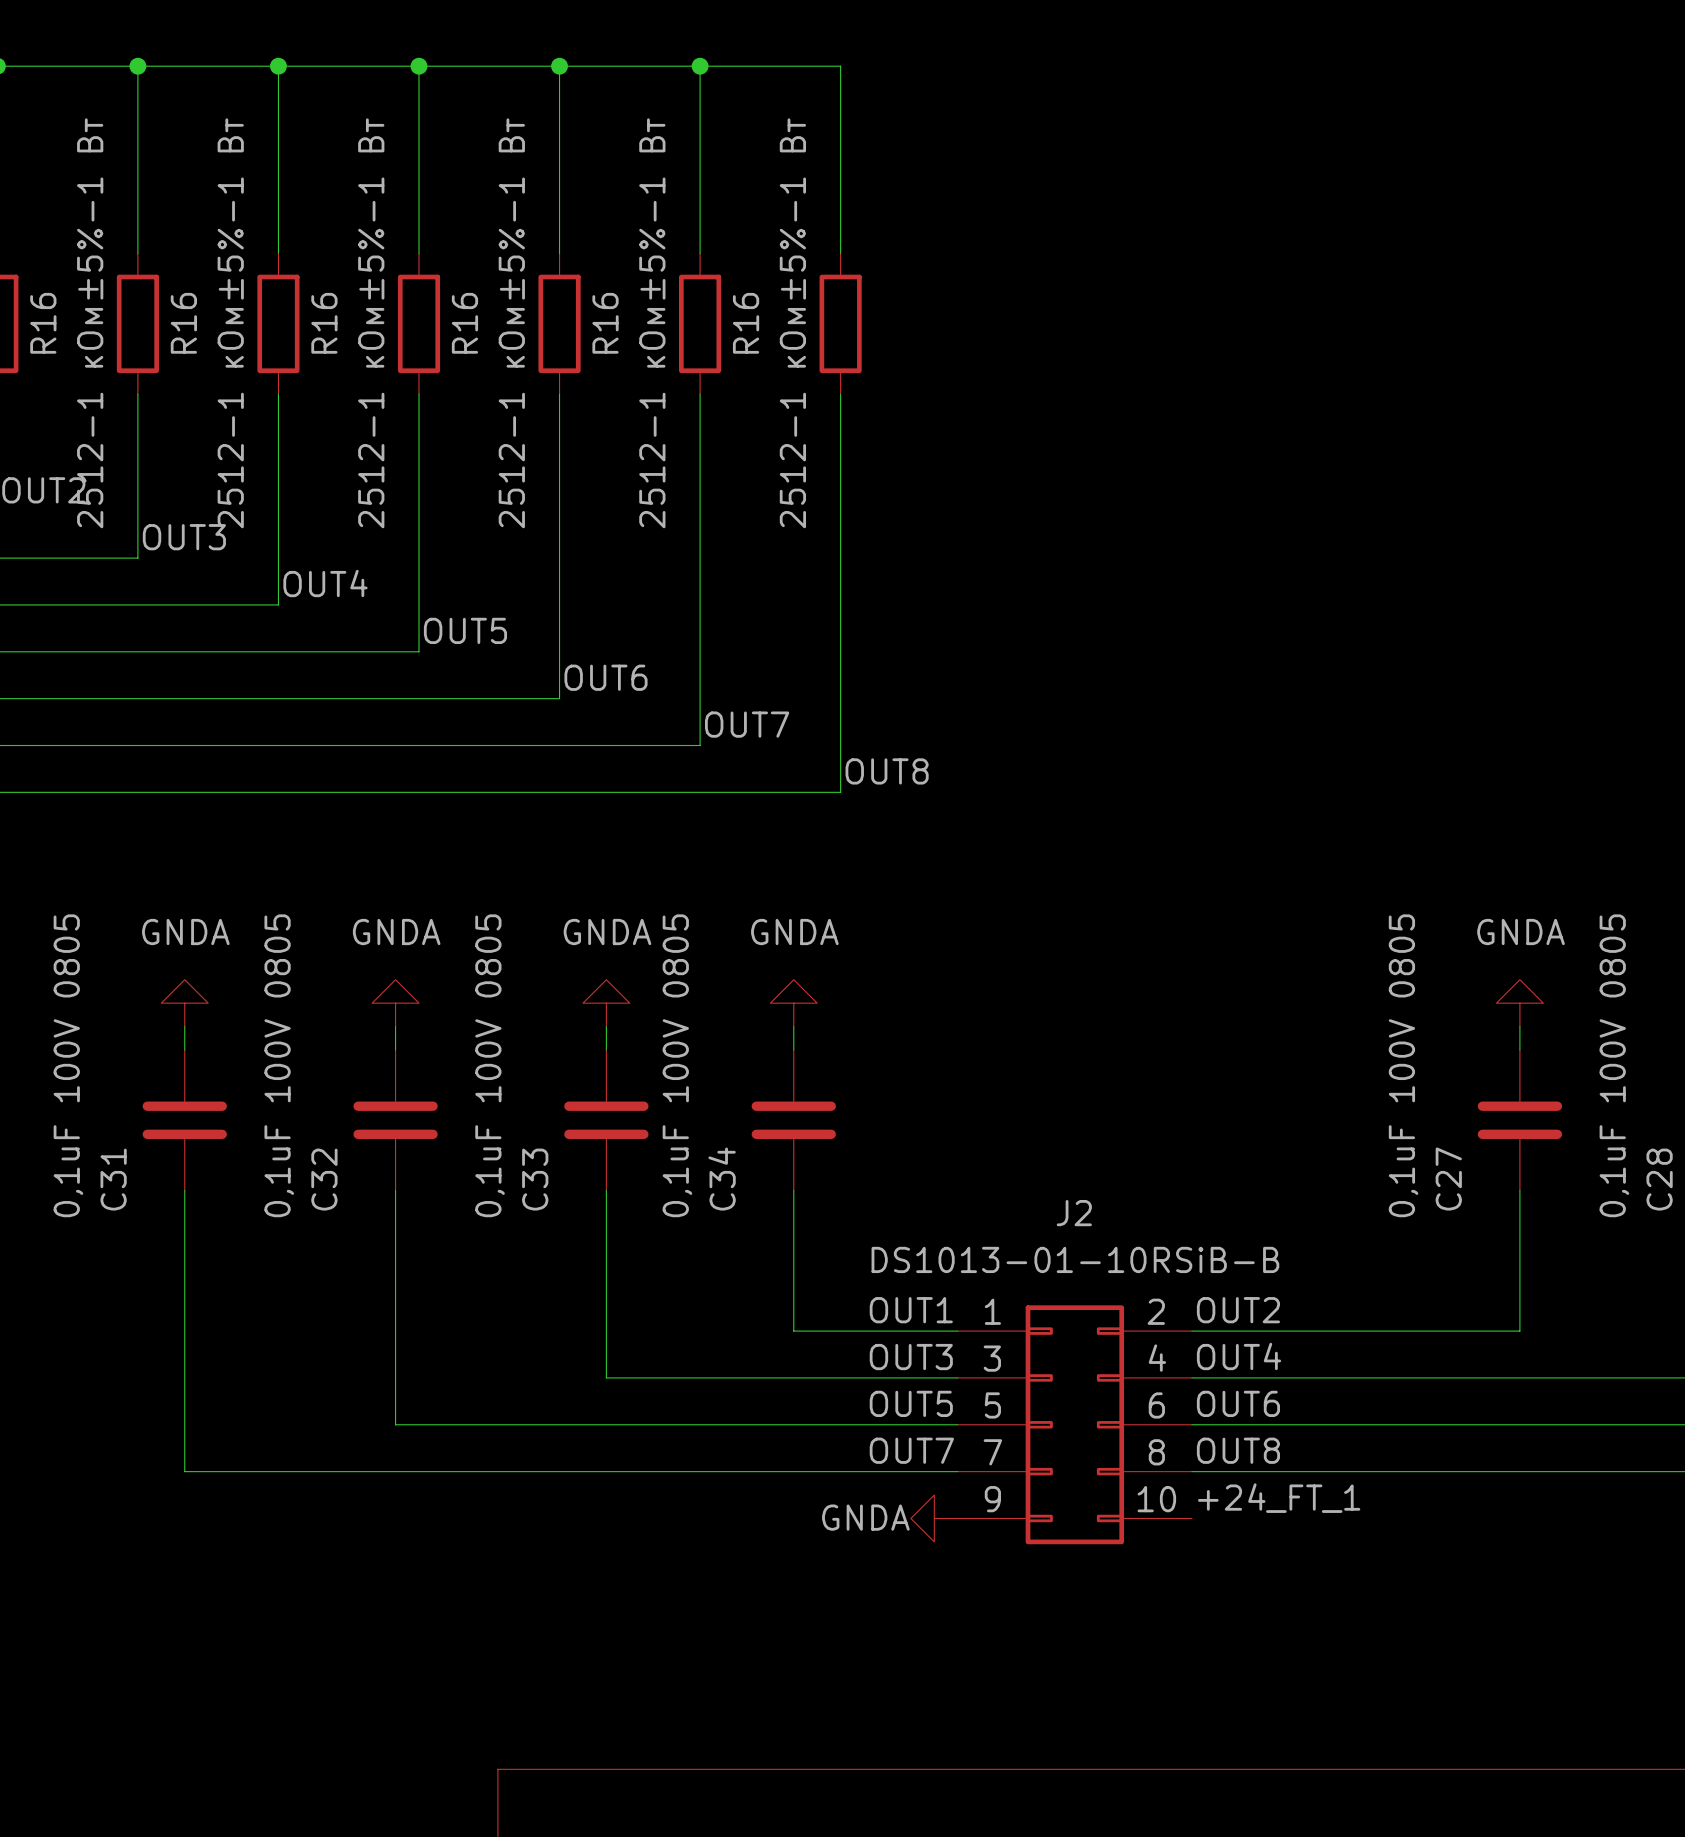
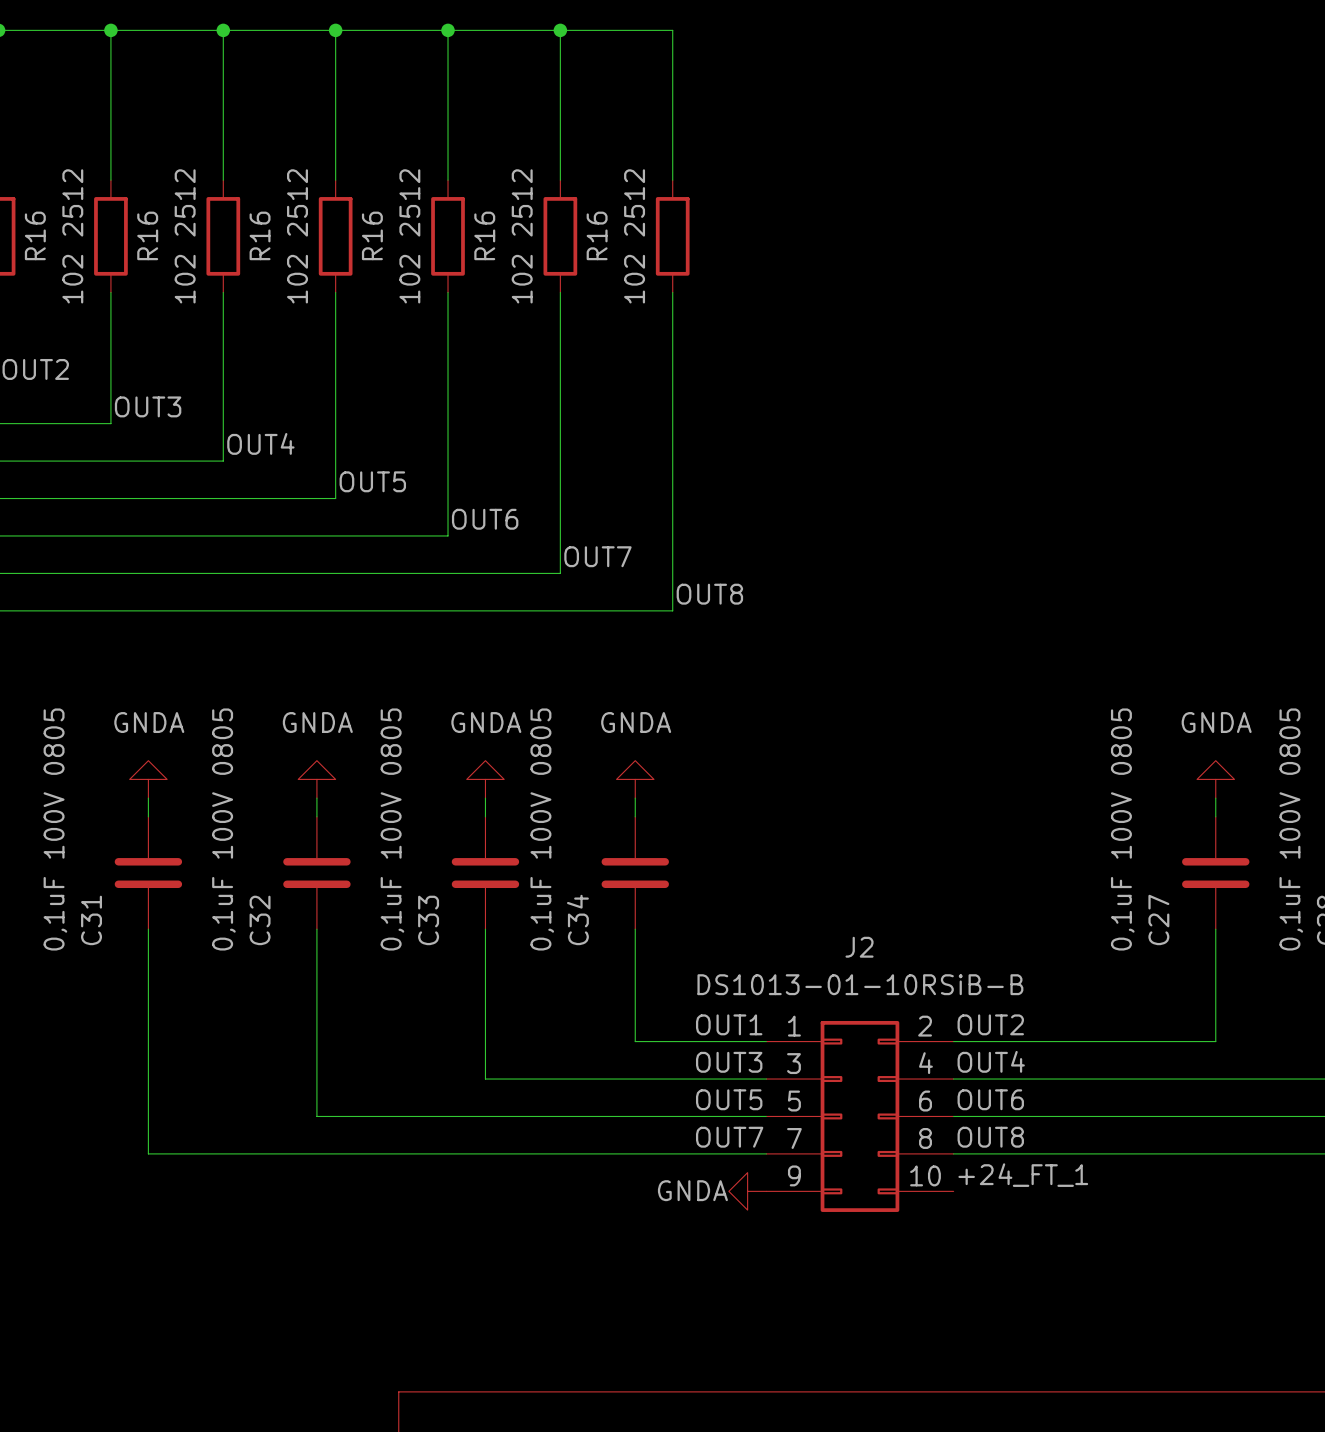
R16 value: 2512-1 кОм±5%-1 Вт (90, 323) -> 102 2512 (72, 236)
R16 value: 2512-1 кОм±5%-1 Вт (230, 323) -> 102 2512 (185, 236)
R16 value: 2512-1 кОм±5%-1 Вт (371, 323) -> 102 2512 (297, 236)
R16 value: 2512-1 кОм±5%-1 Вт (511, 323) -> 102 2512 (409, 236)
R16 value: 2512-1 кОм±5%-1 Вт (652, 323) -> 102 2512 (522, 236)
R16 value: 2512-1 кОм±5%-1 Вт (792, 323) -> 102 2512 (634, 236)

